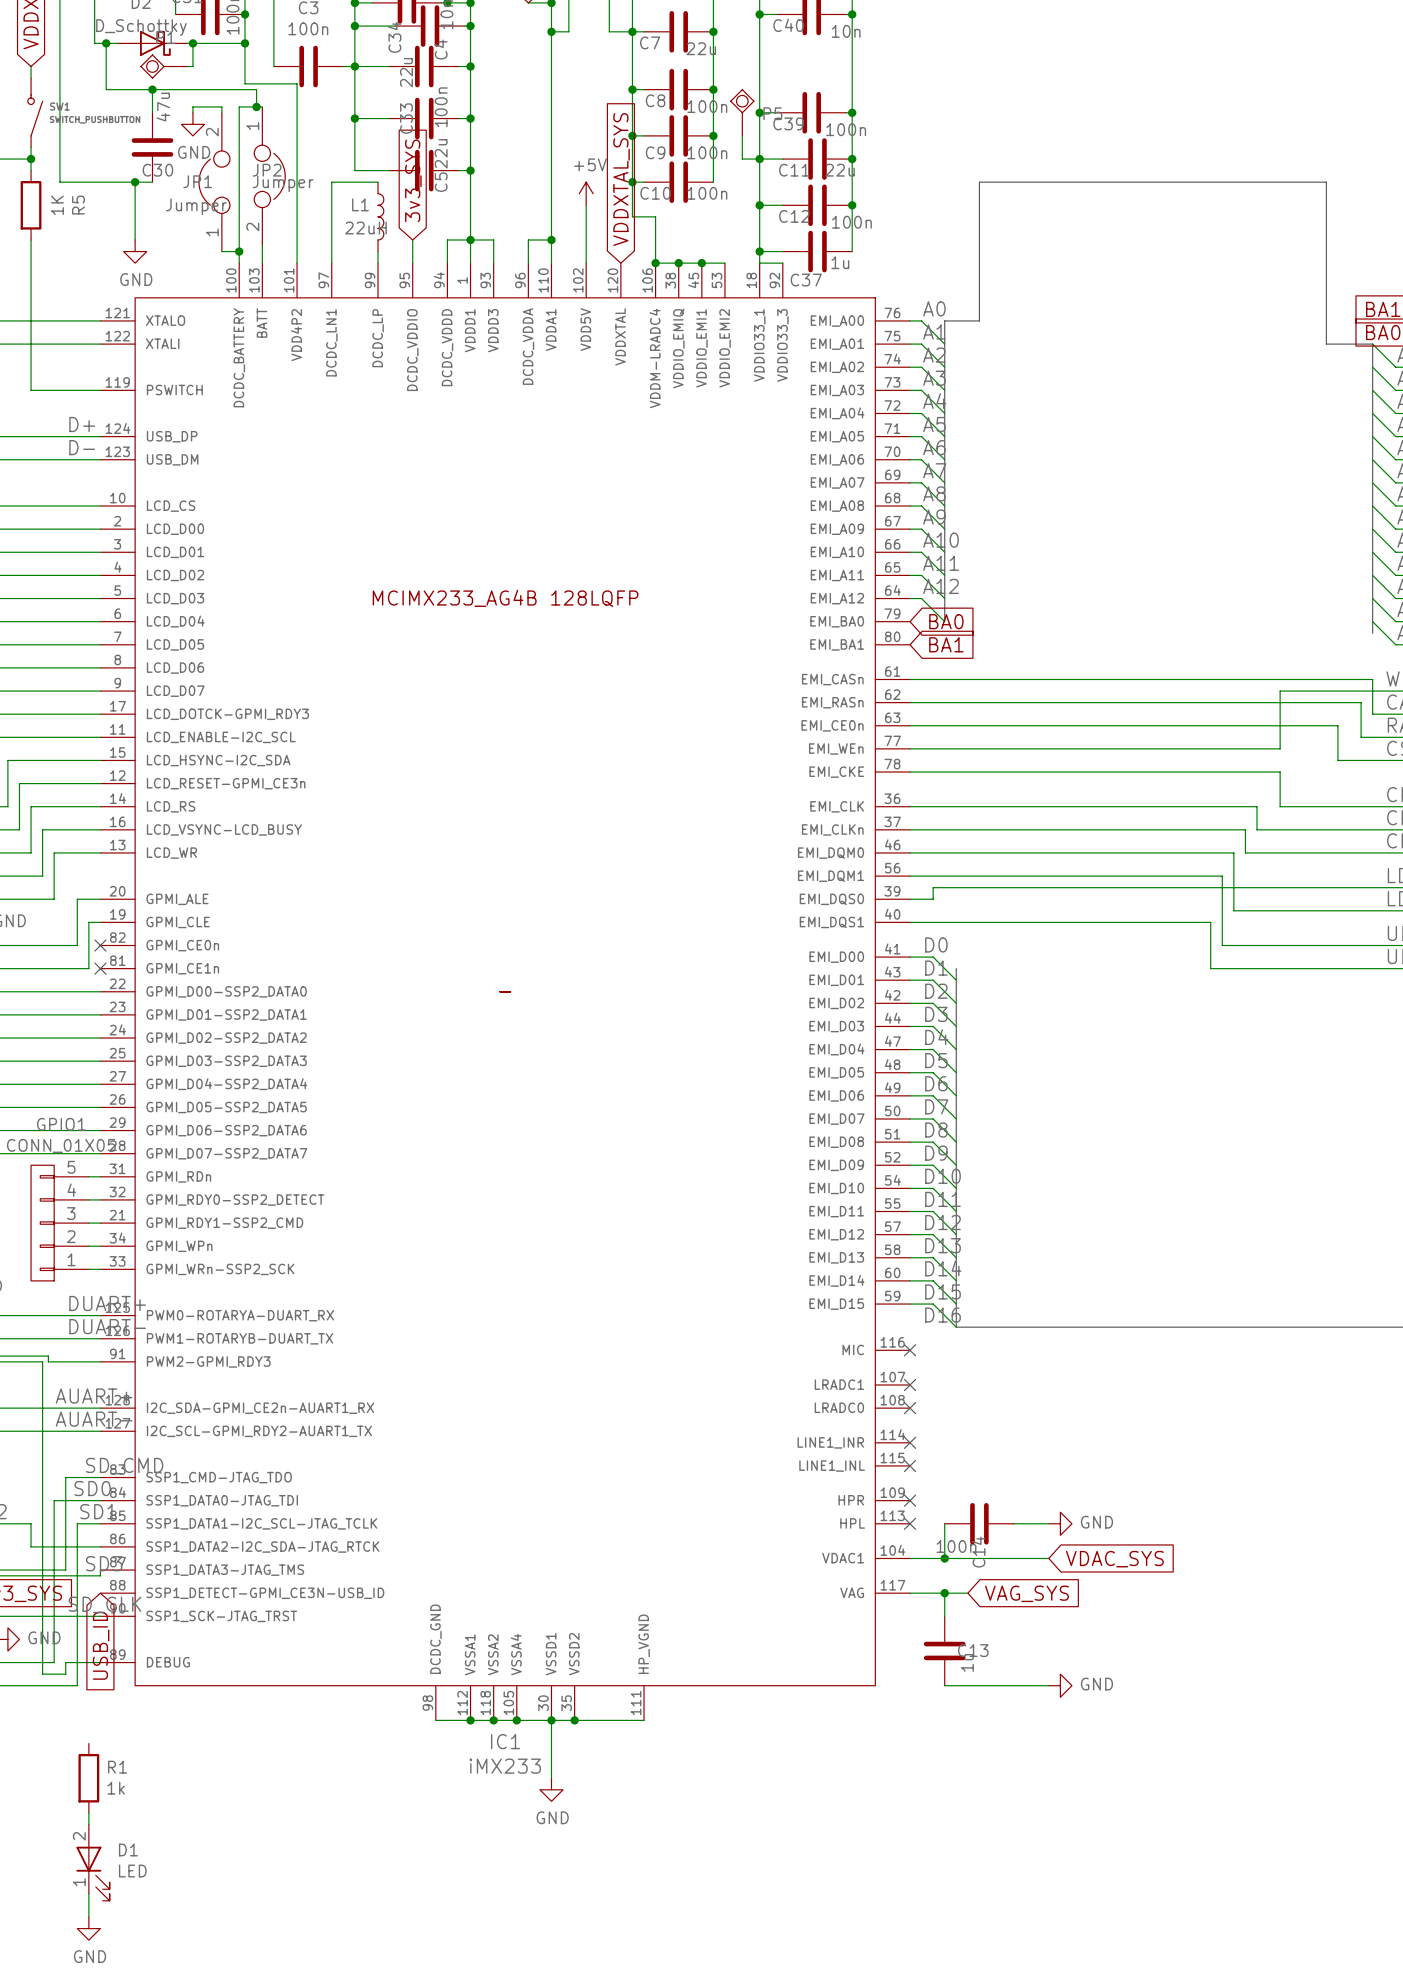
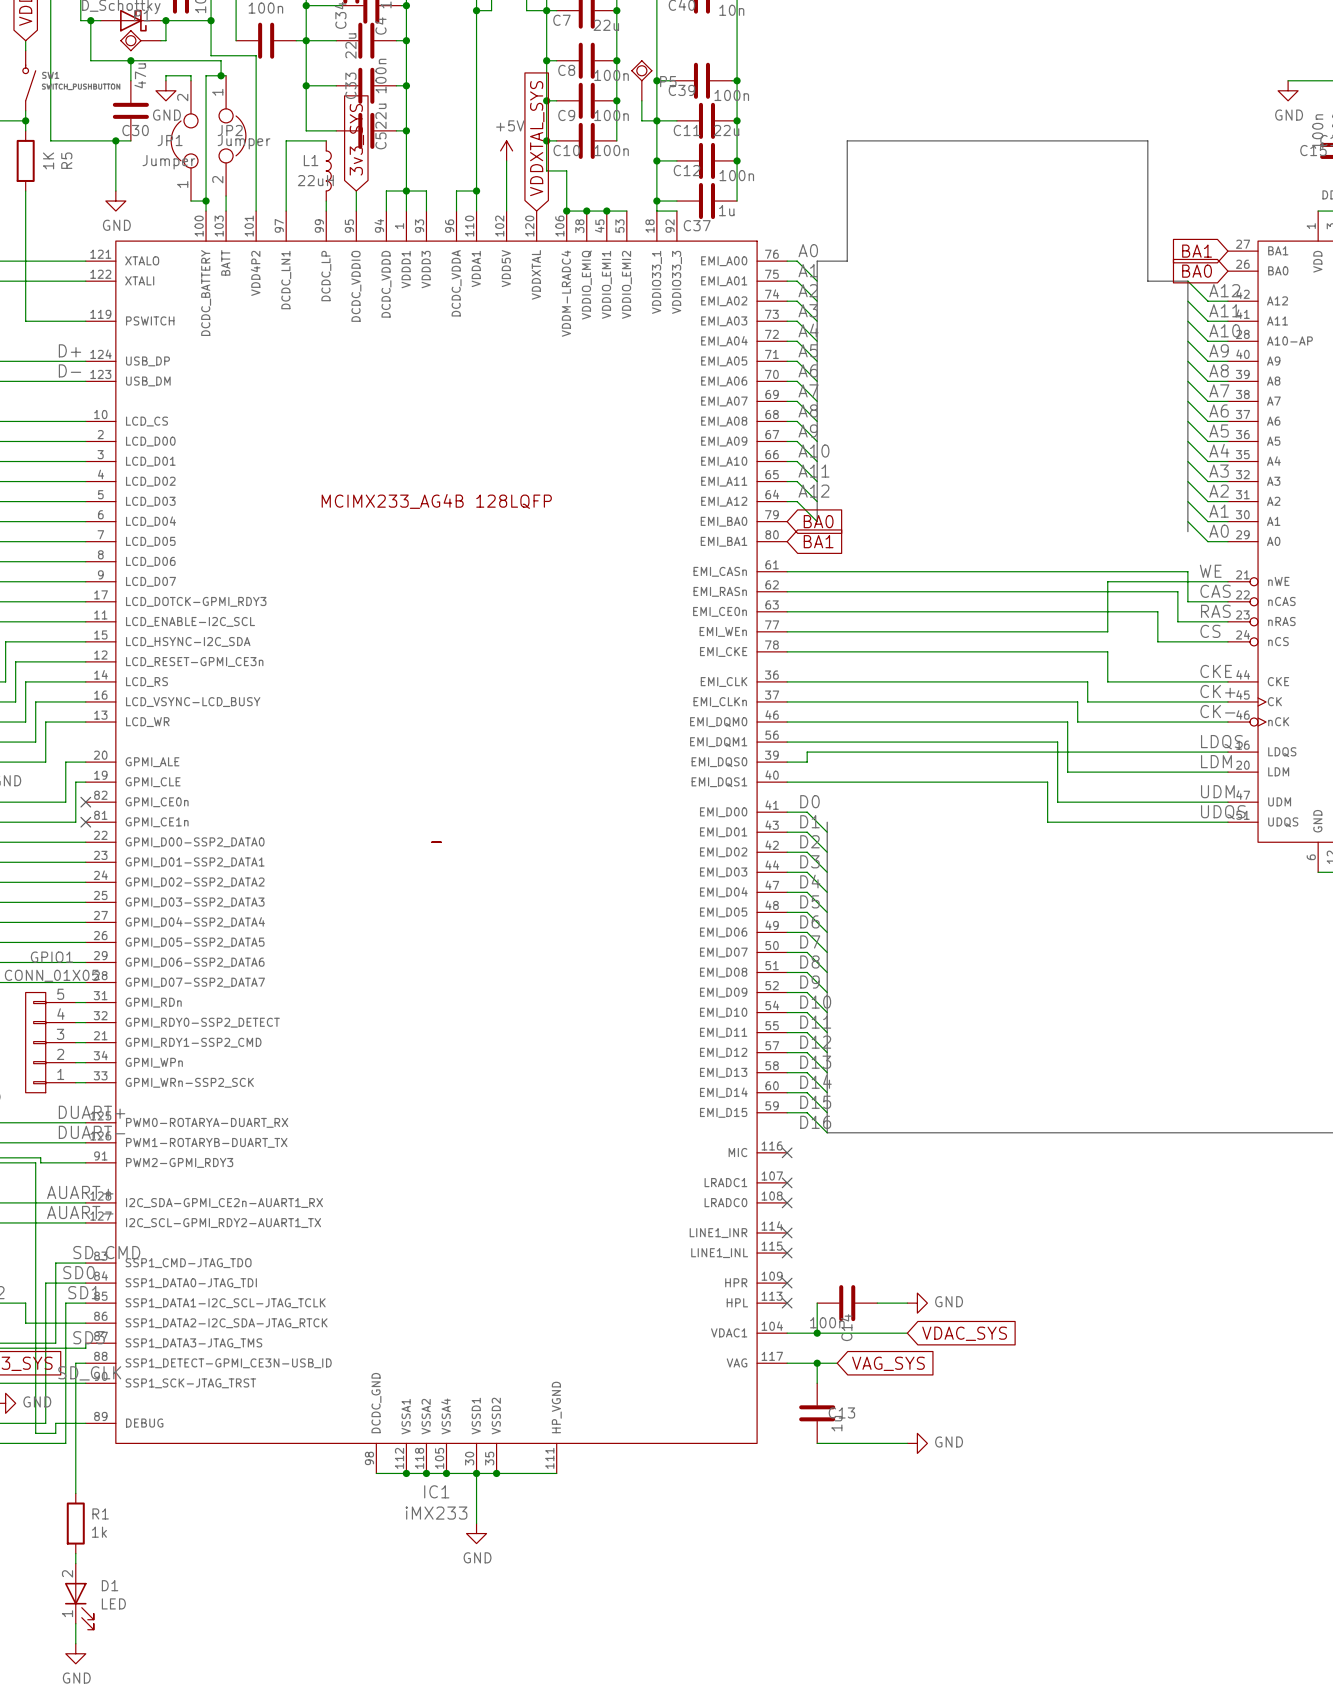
wire: none -> (85, 1363) (75, 1363) (75, 1493)
global label: USB_ID (101, 1645) -> none

